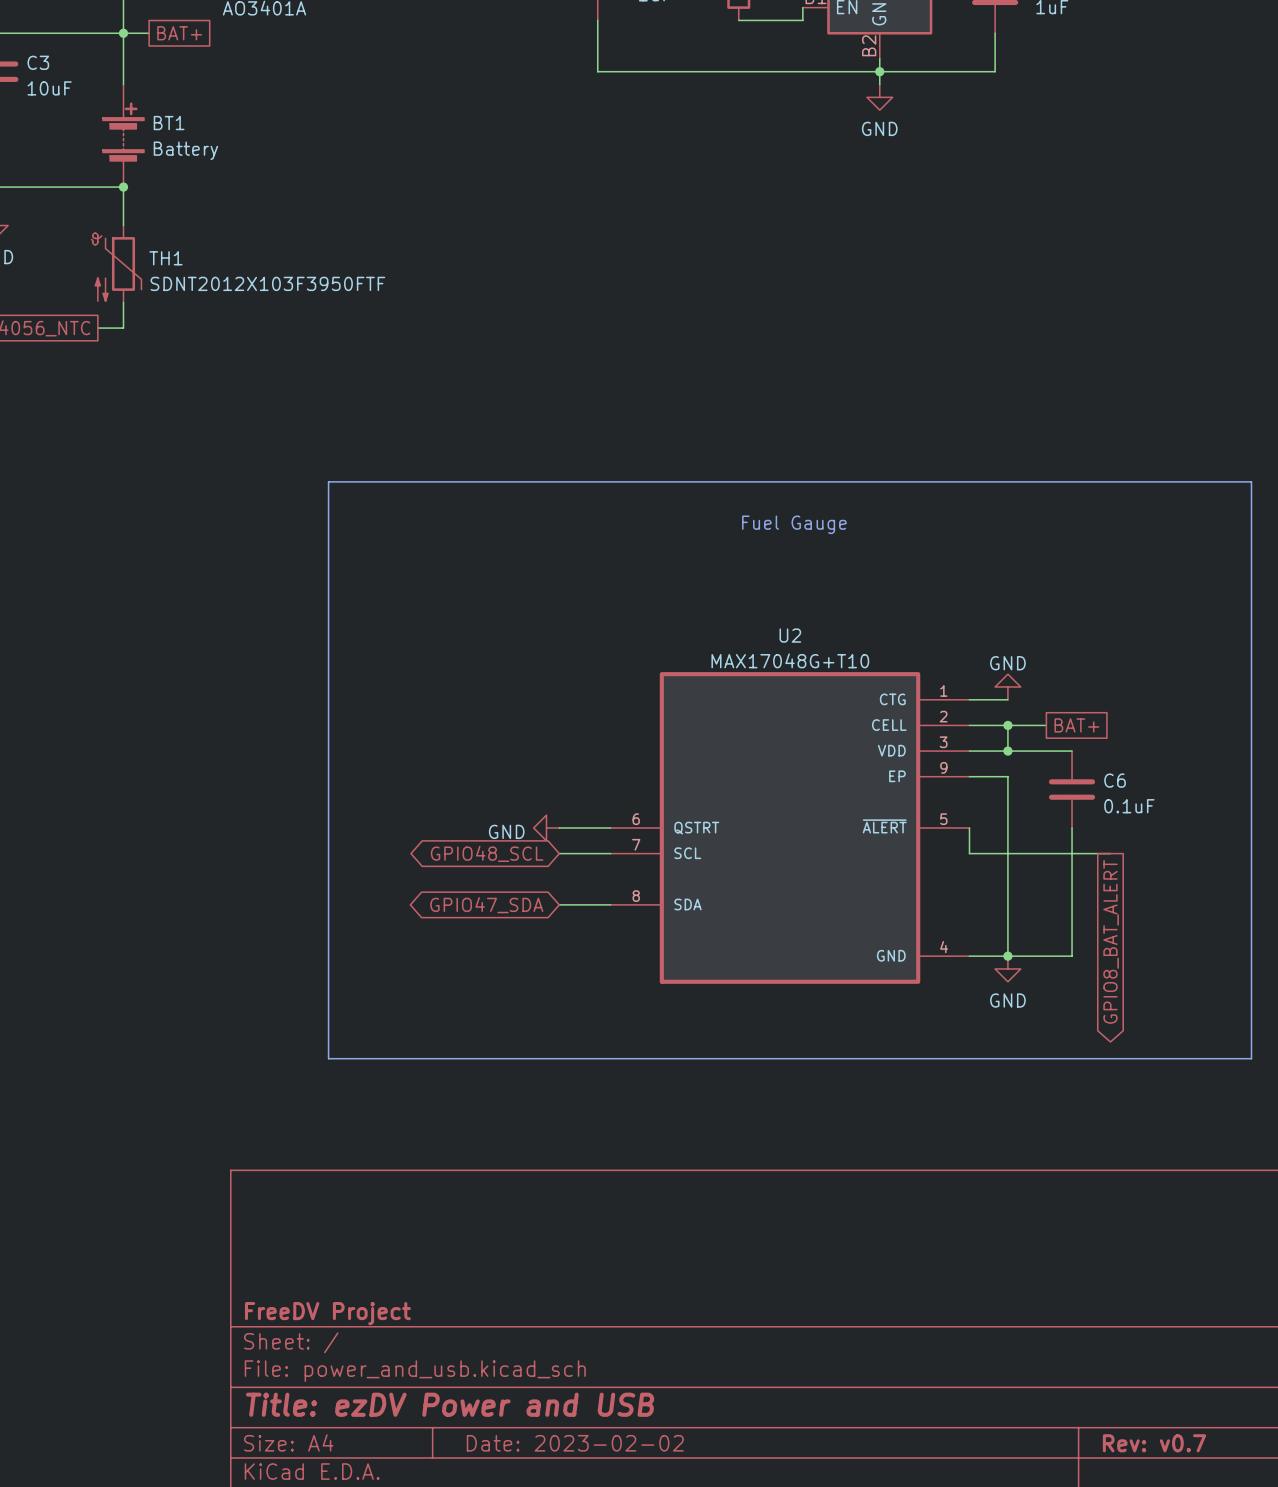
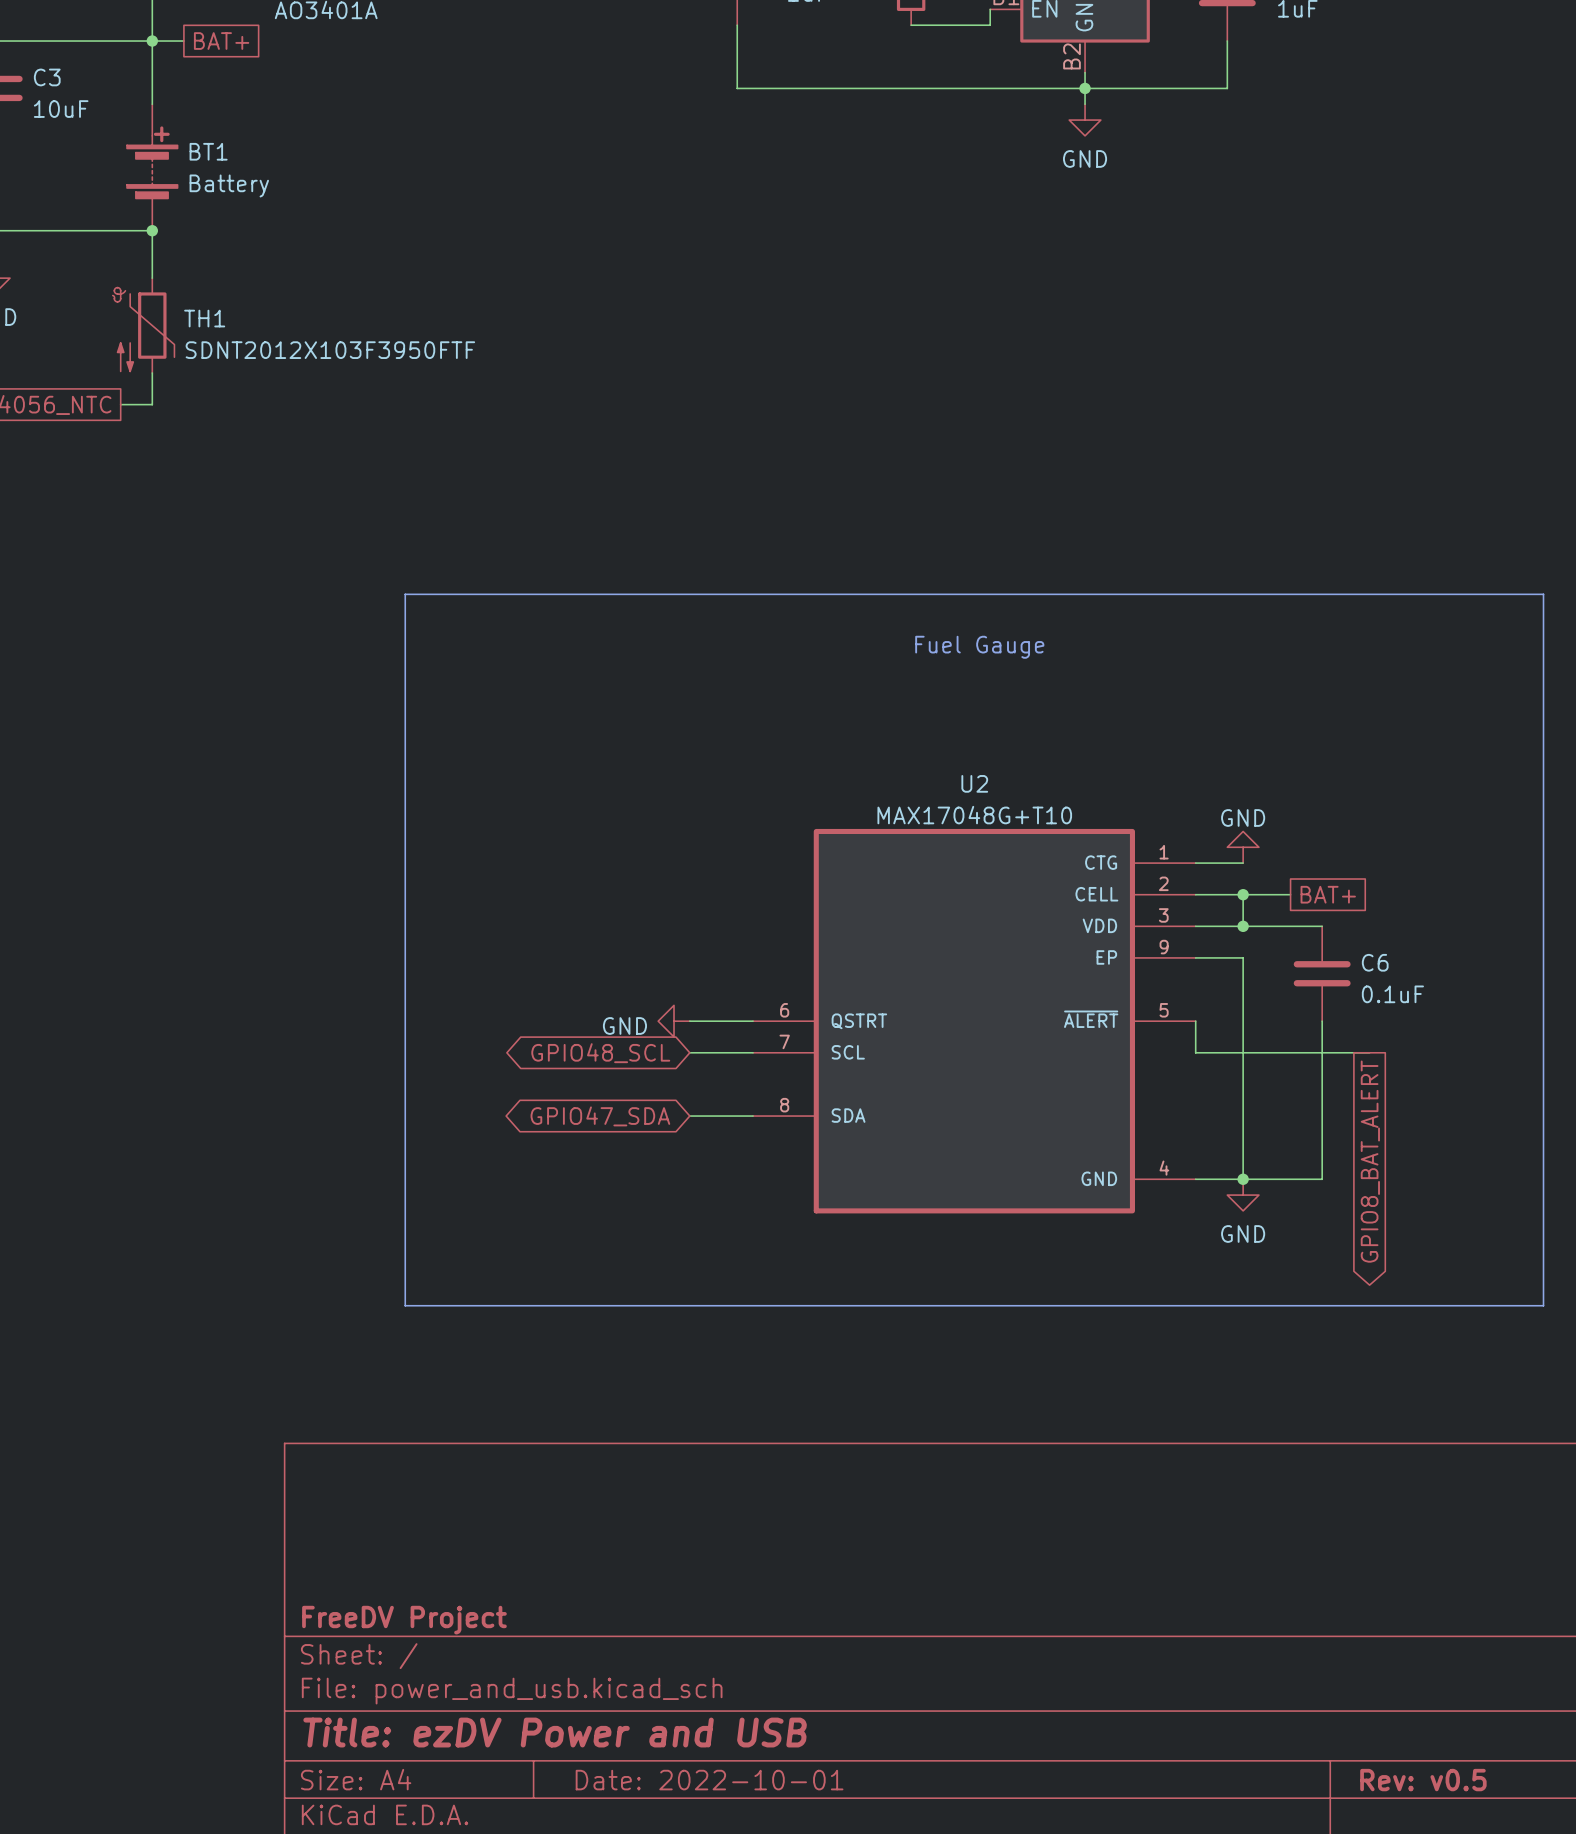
title block: Date: 2023-02-02 (575, 1443) -> Date: 2022-10-01 (709, 1780)
title block: Rev: v0.7 (1154, 1443) -> Rev: v0.5 (1423, 1780)

